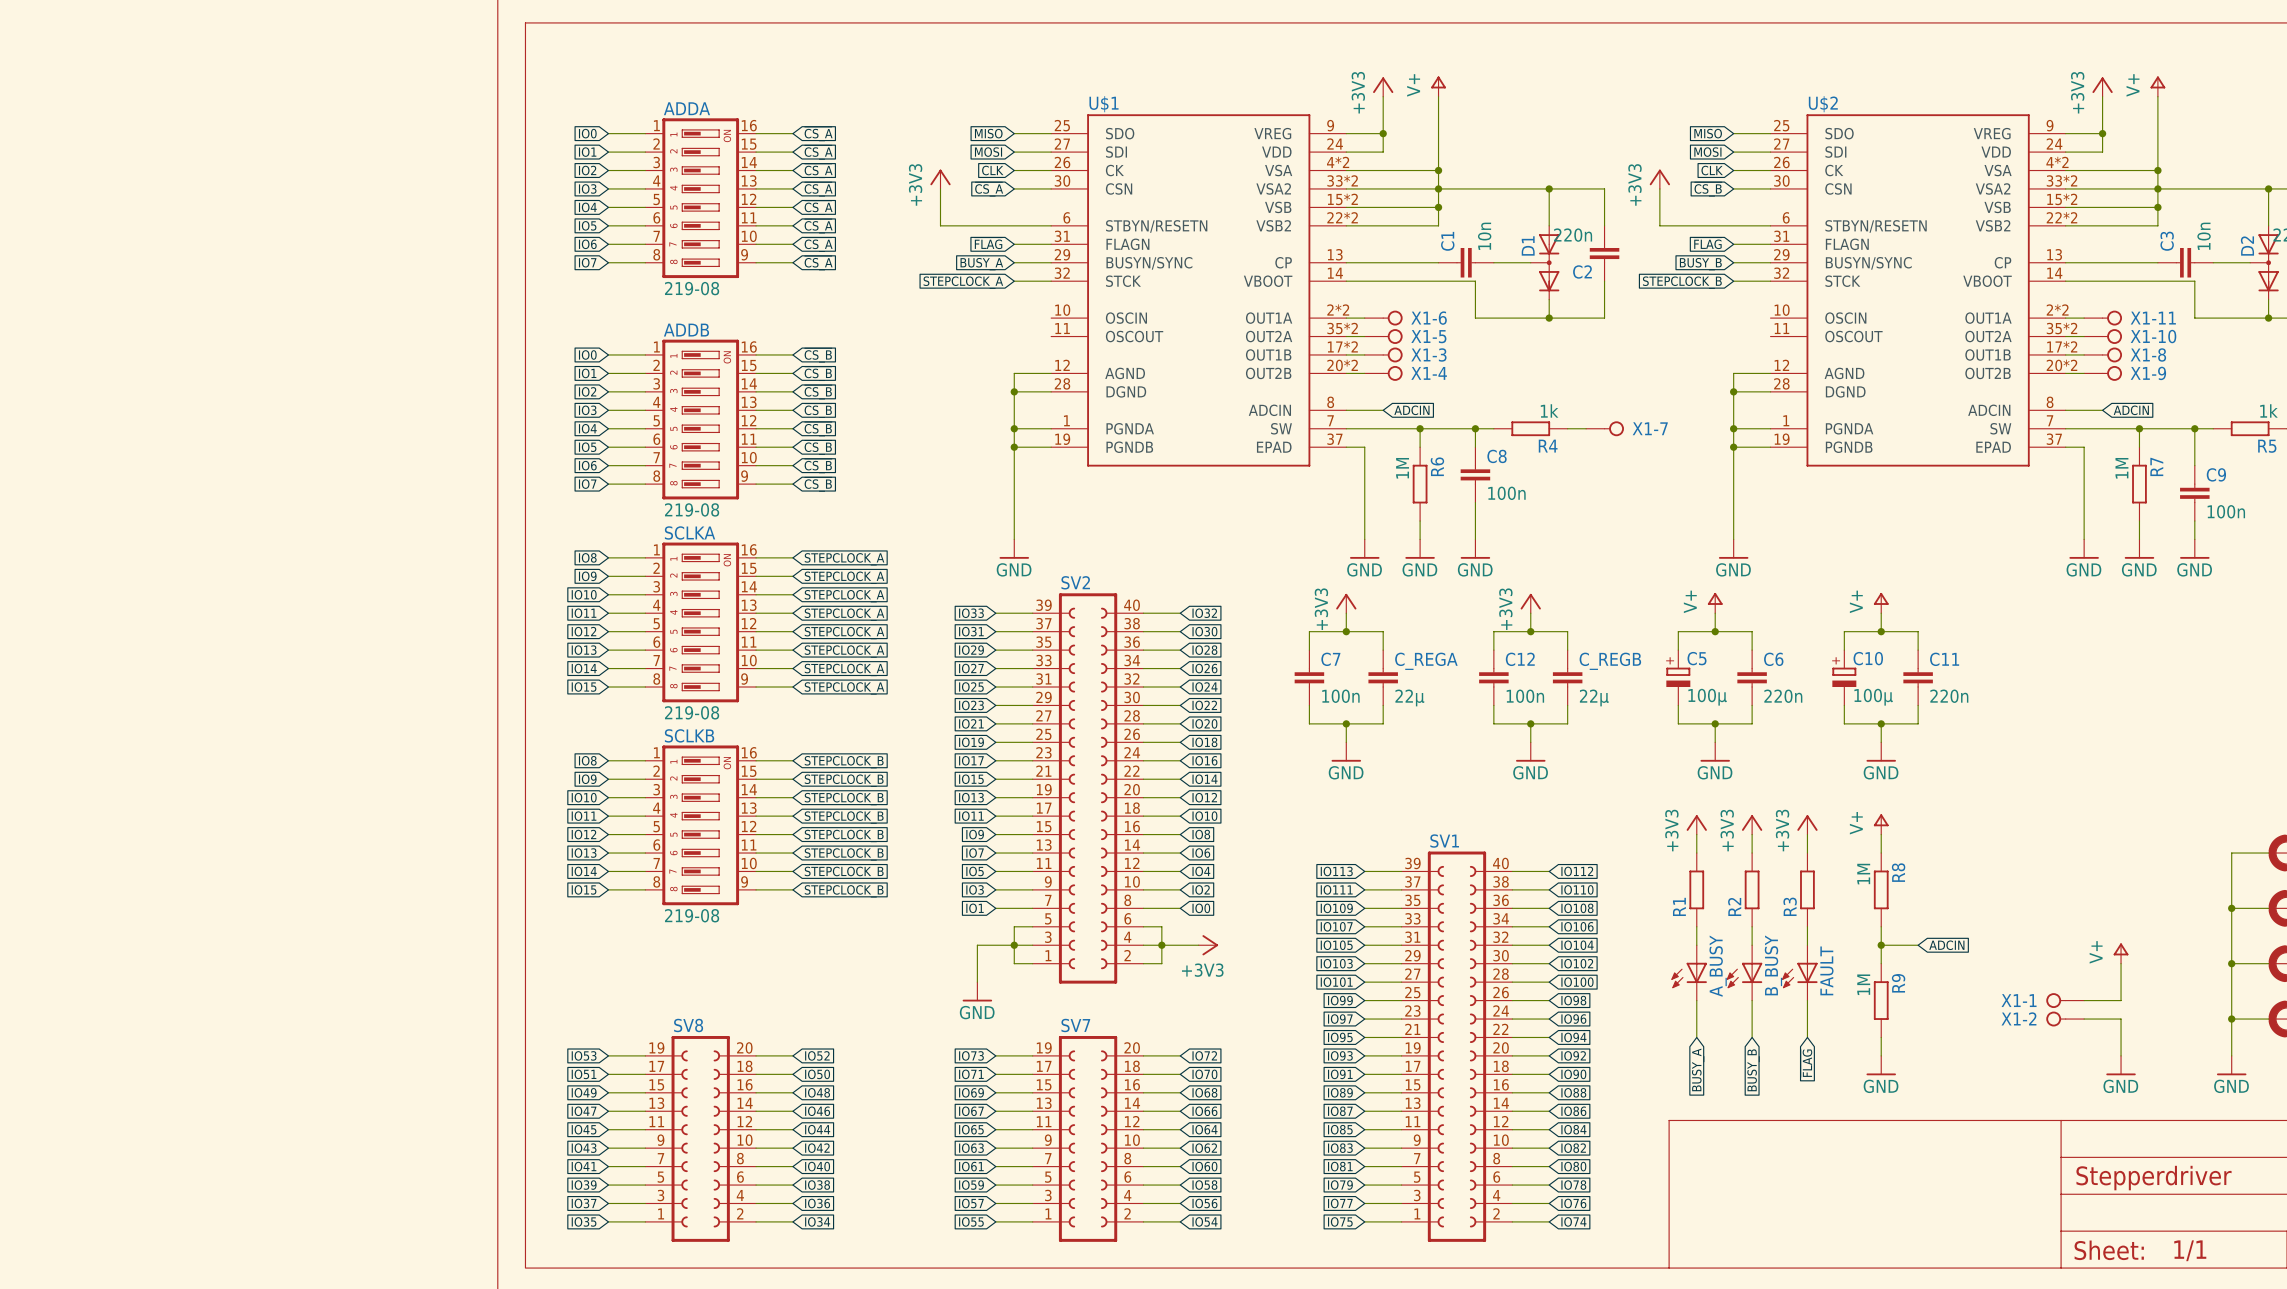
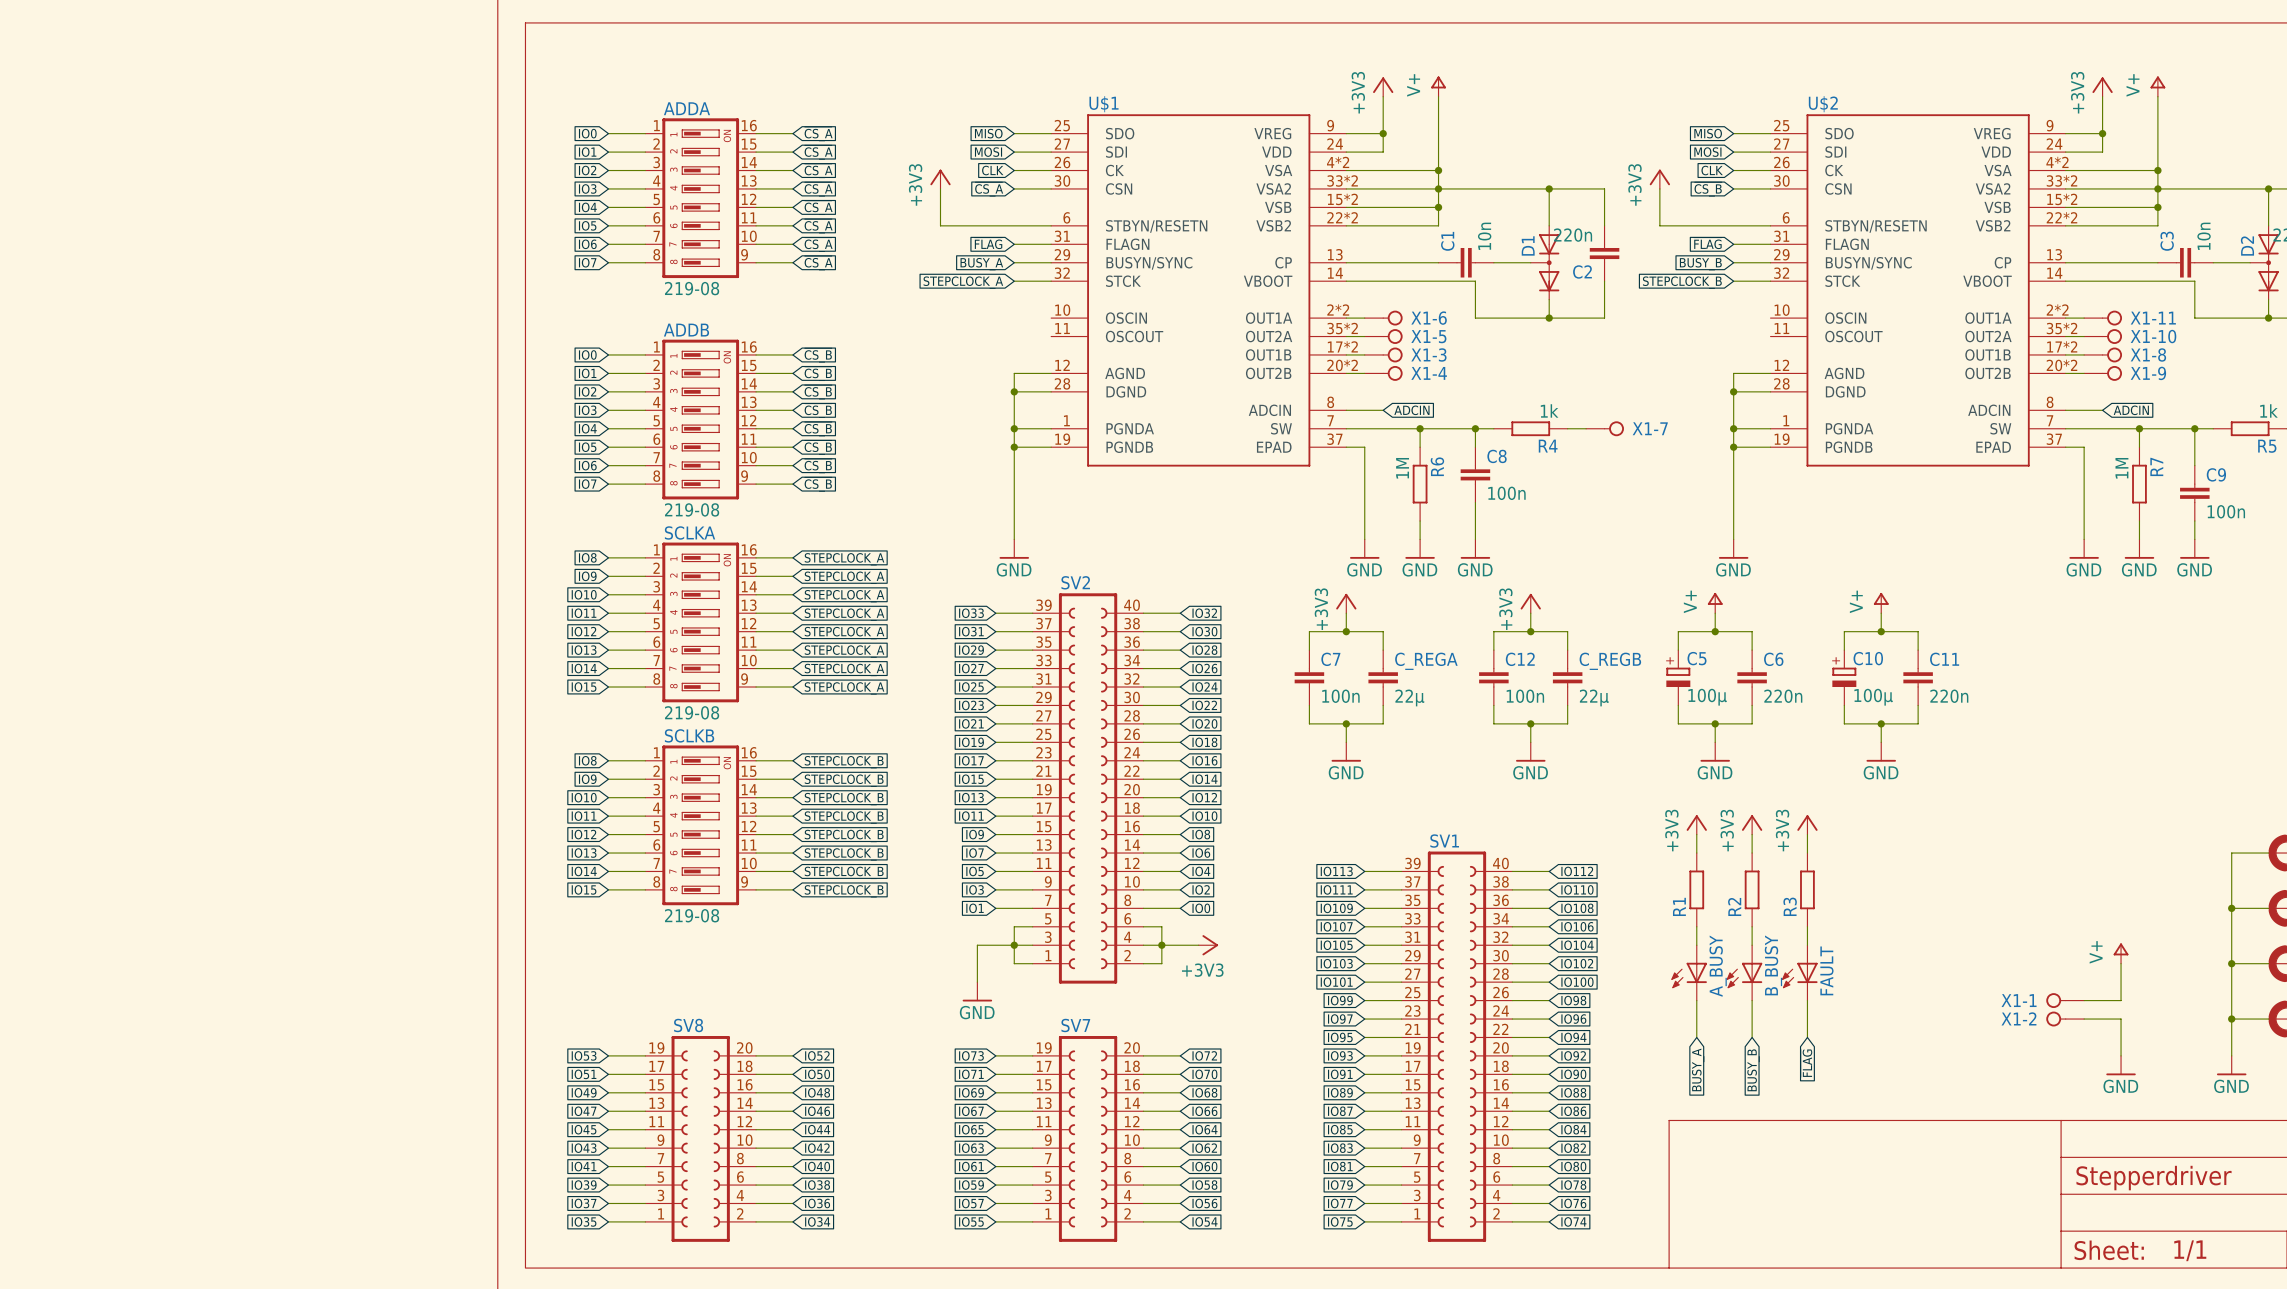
power symbol: V+ (1881, 824) -> none
wire: (1881, 834) (1881, 853) -> none
R8: 1M (1881, 889) -> none
wire: (1881, 926) (1881, 963) -> none
wire: (1881, 945) (1918, 945) -> none
junction: (1881, 945) -> none
global label: ADCIN (1946, 945) -> none
R9: 1M (1881, 1000) -> none
wire: (1881, 1037) (1881, 1055) -> none
power symbol: GND (1881, 1065) -> none

